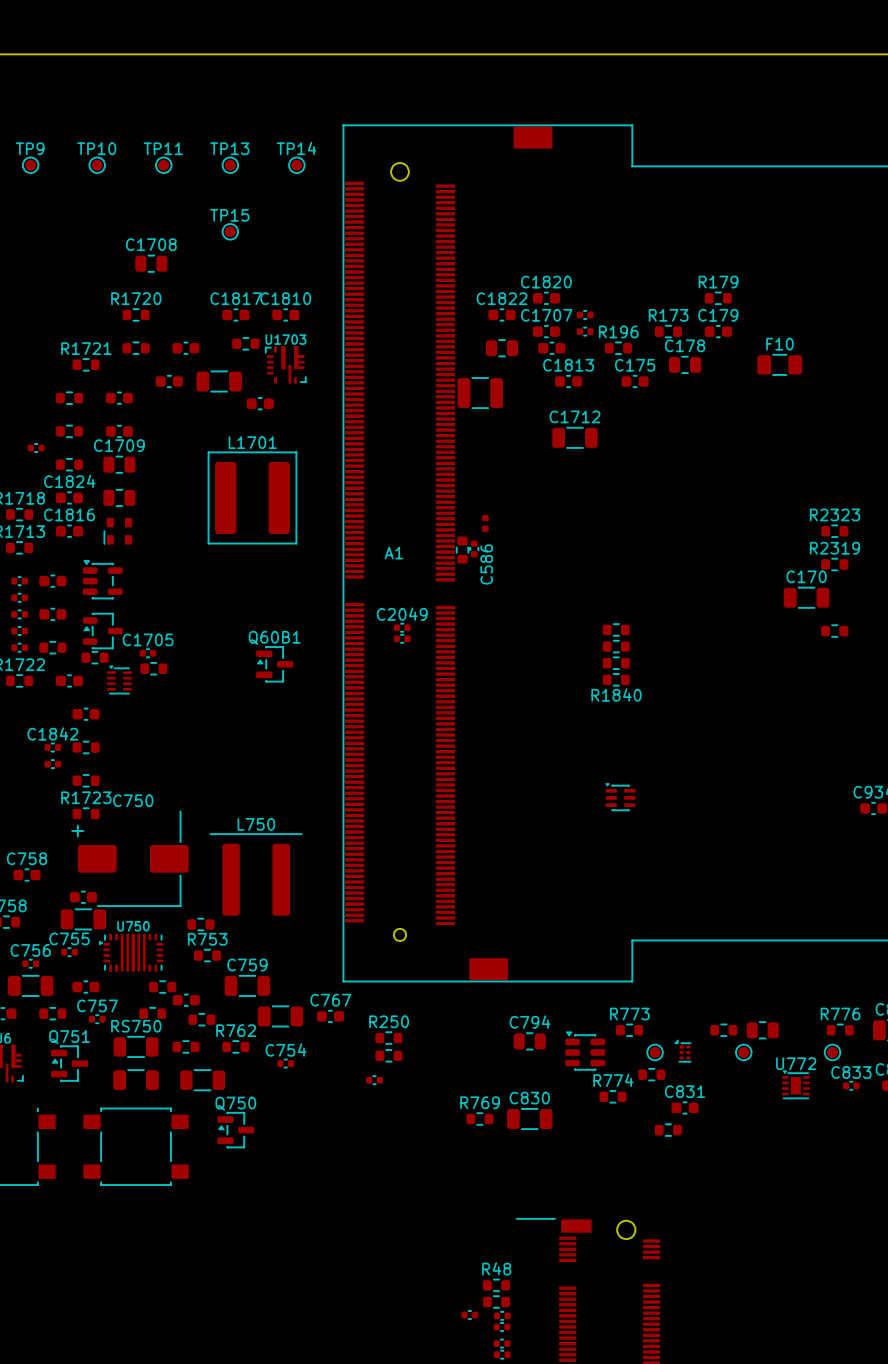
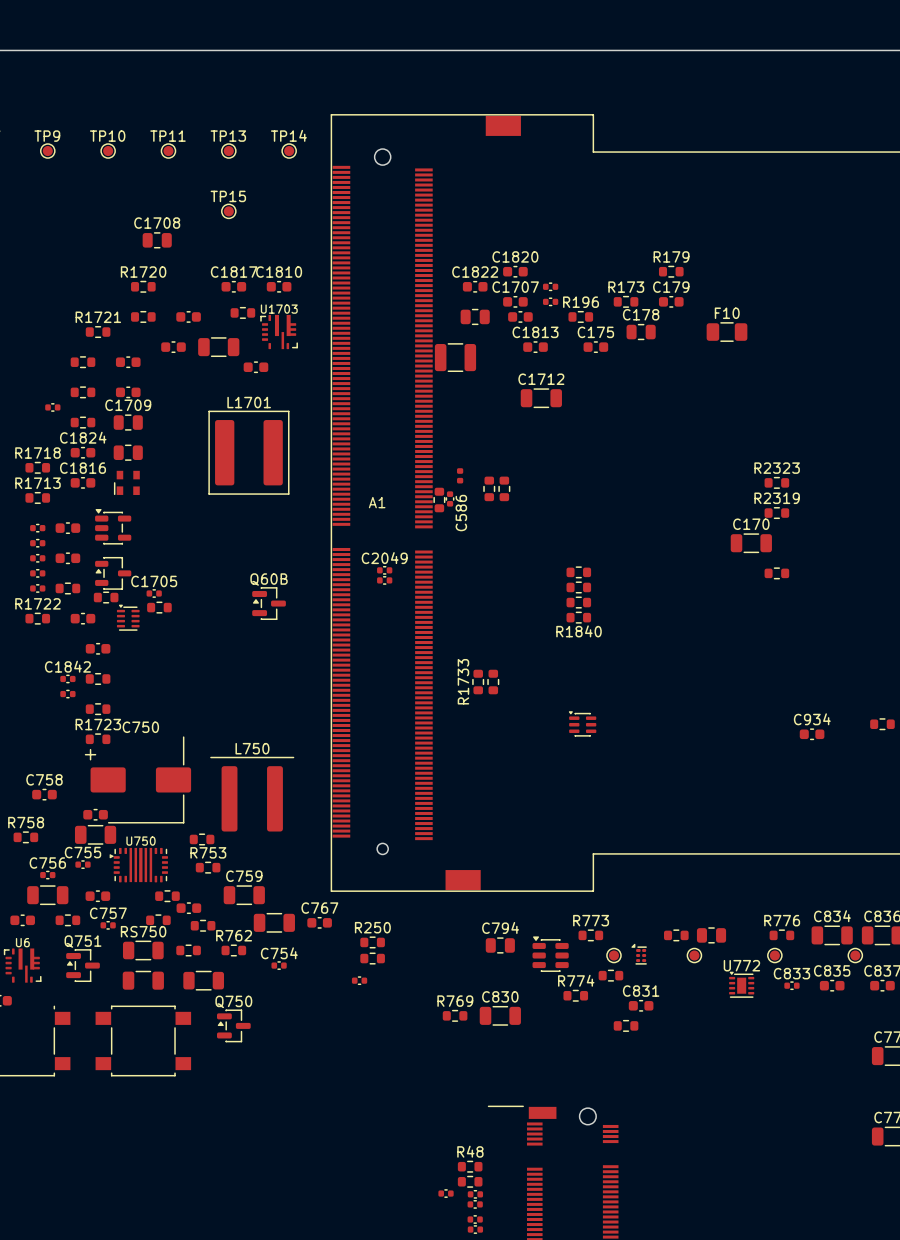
part: none -> (489, 488)
part: none -> (504, 488)
Q60B1 name: Q60B1 (274, 637) -> Q60B (269, 579)
R1733: none -> (478, 682)
part: none -> (493, 682)

